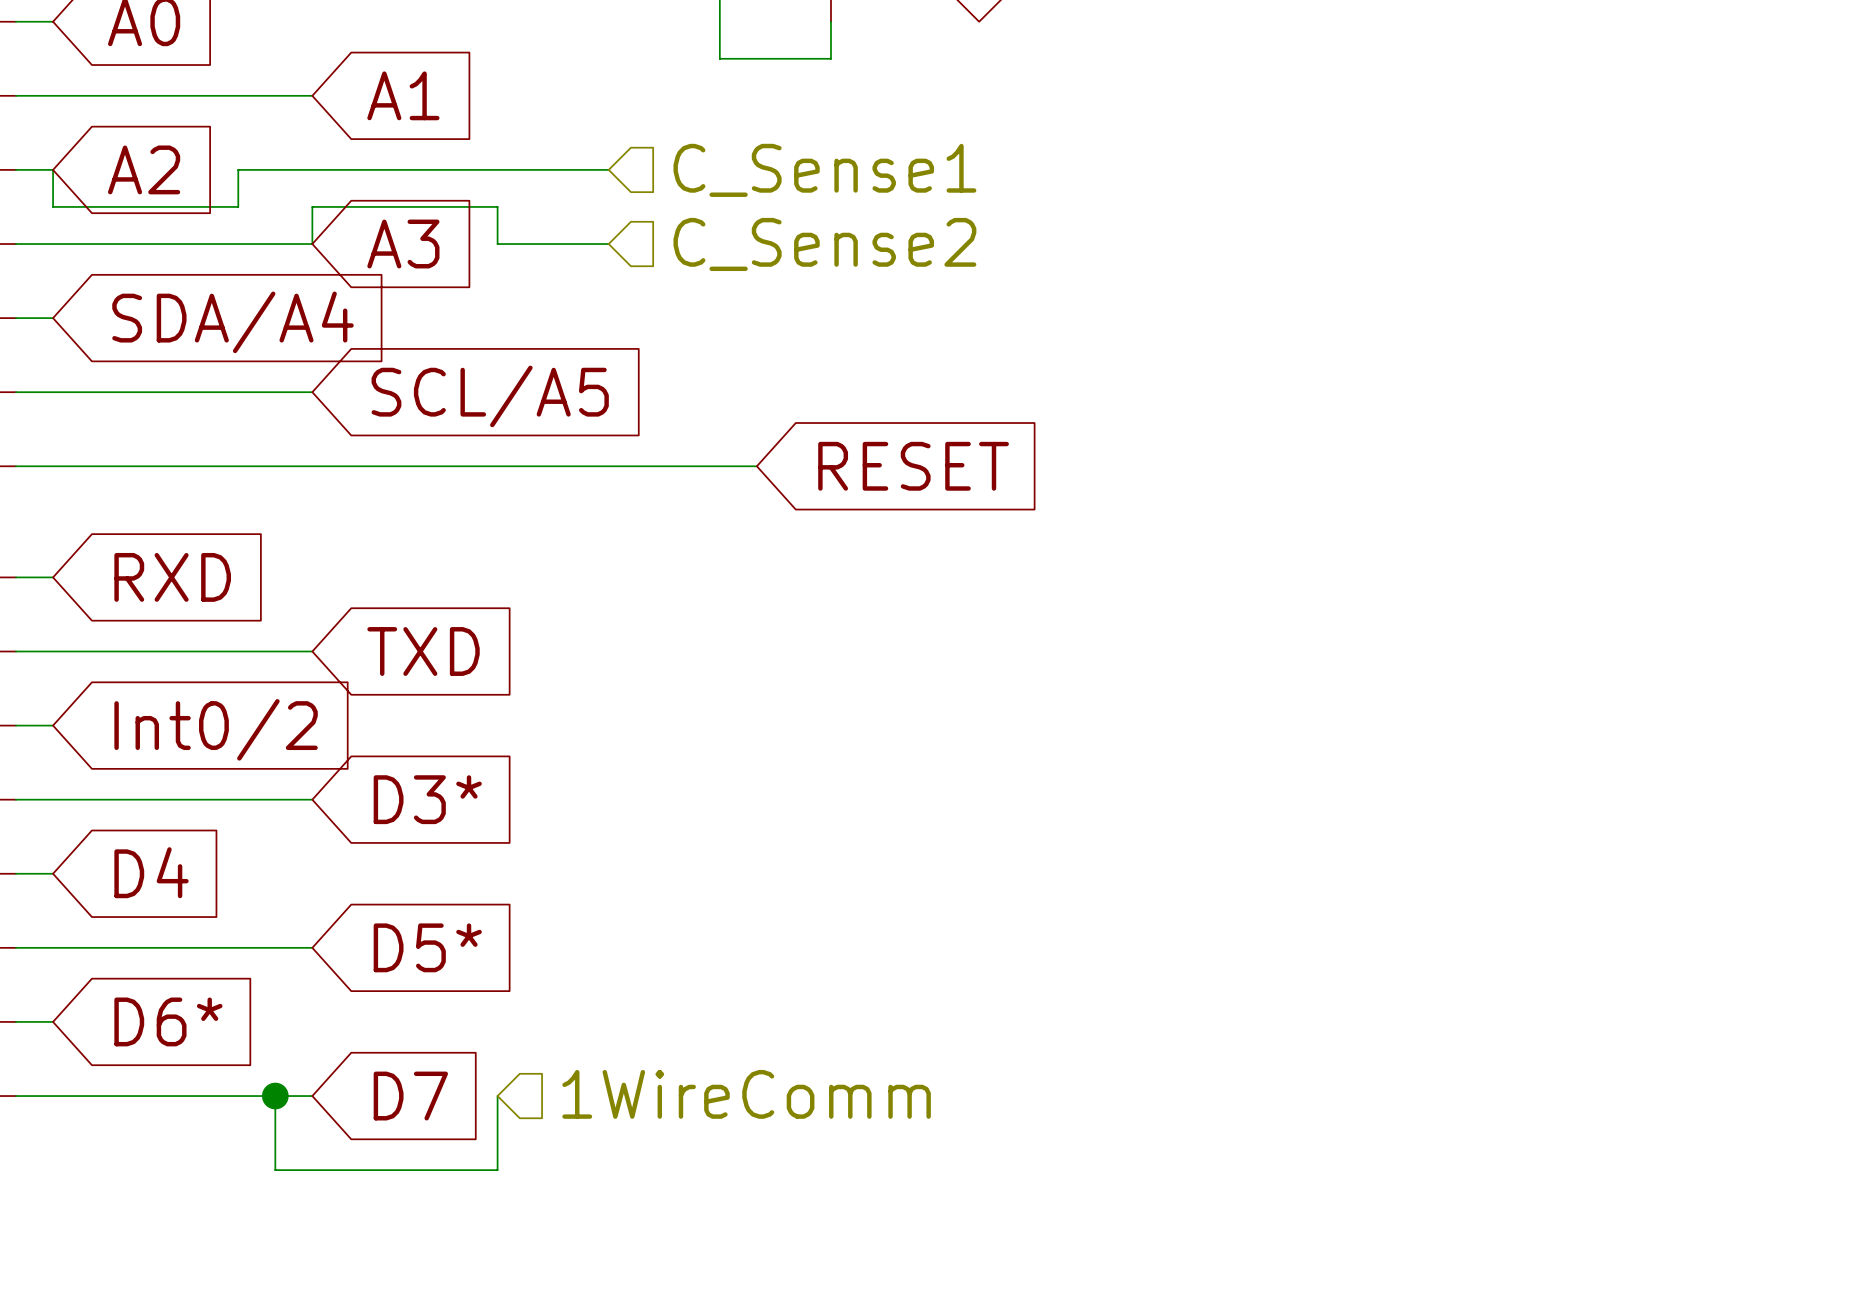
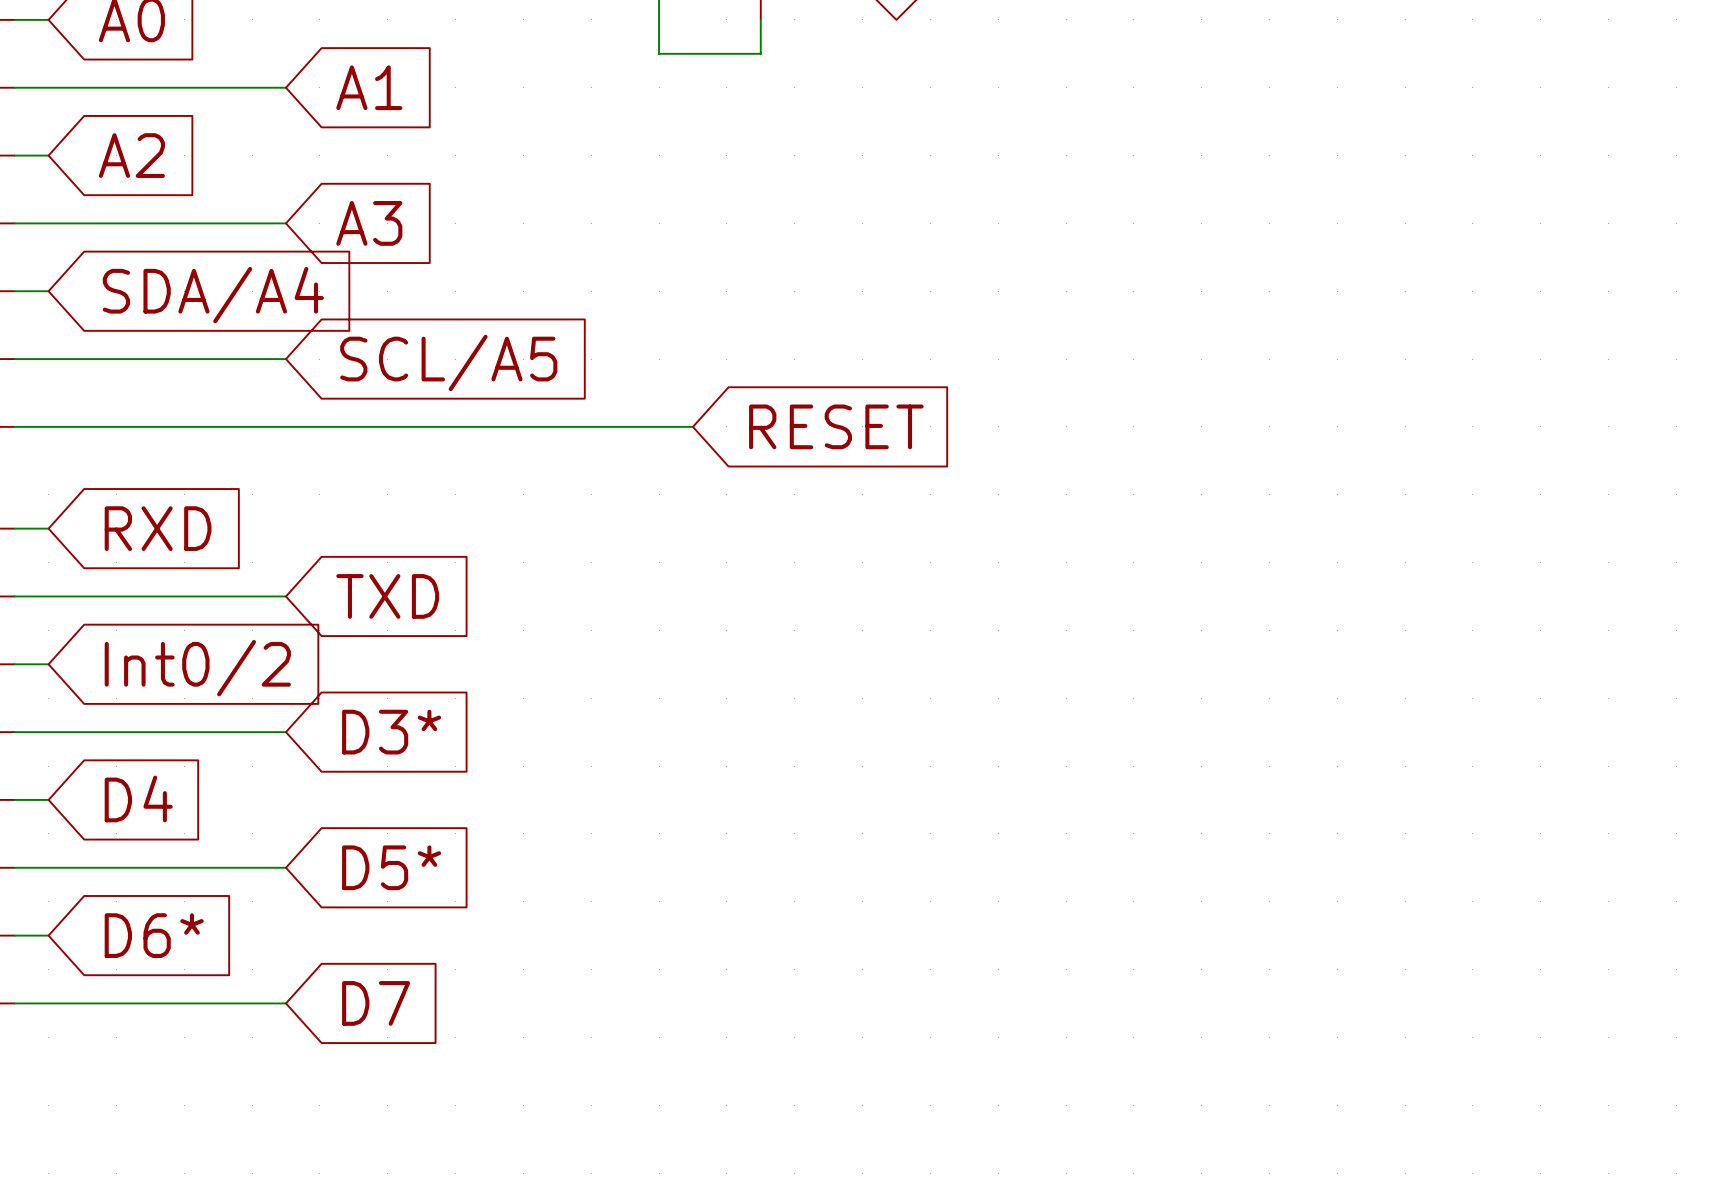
wire: (53, 169) (53, 206) (238, 206) (238, 169) (608, 169) -> none
hierarchical label: C_Sense1 (824, 170) -> none
wire: (312, 244) (312, 206) (497, 206) (497, 244) (608, 244) -> none
hierarchical label: C_Sense2 (824, 244) -> none
hierarchical label: 1WireComm (746, 1094) -> none
wire: (275, 1096) (275, 1170) (497, 1170) (497, 1096) -> none
junction: (275, 1096) -> none

